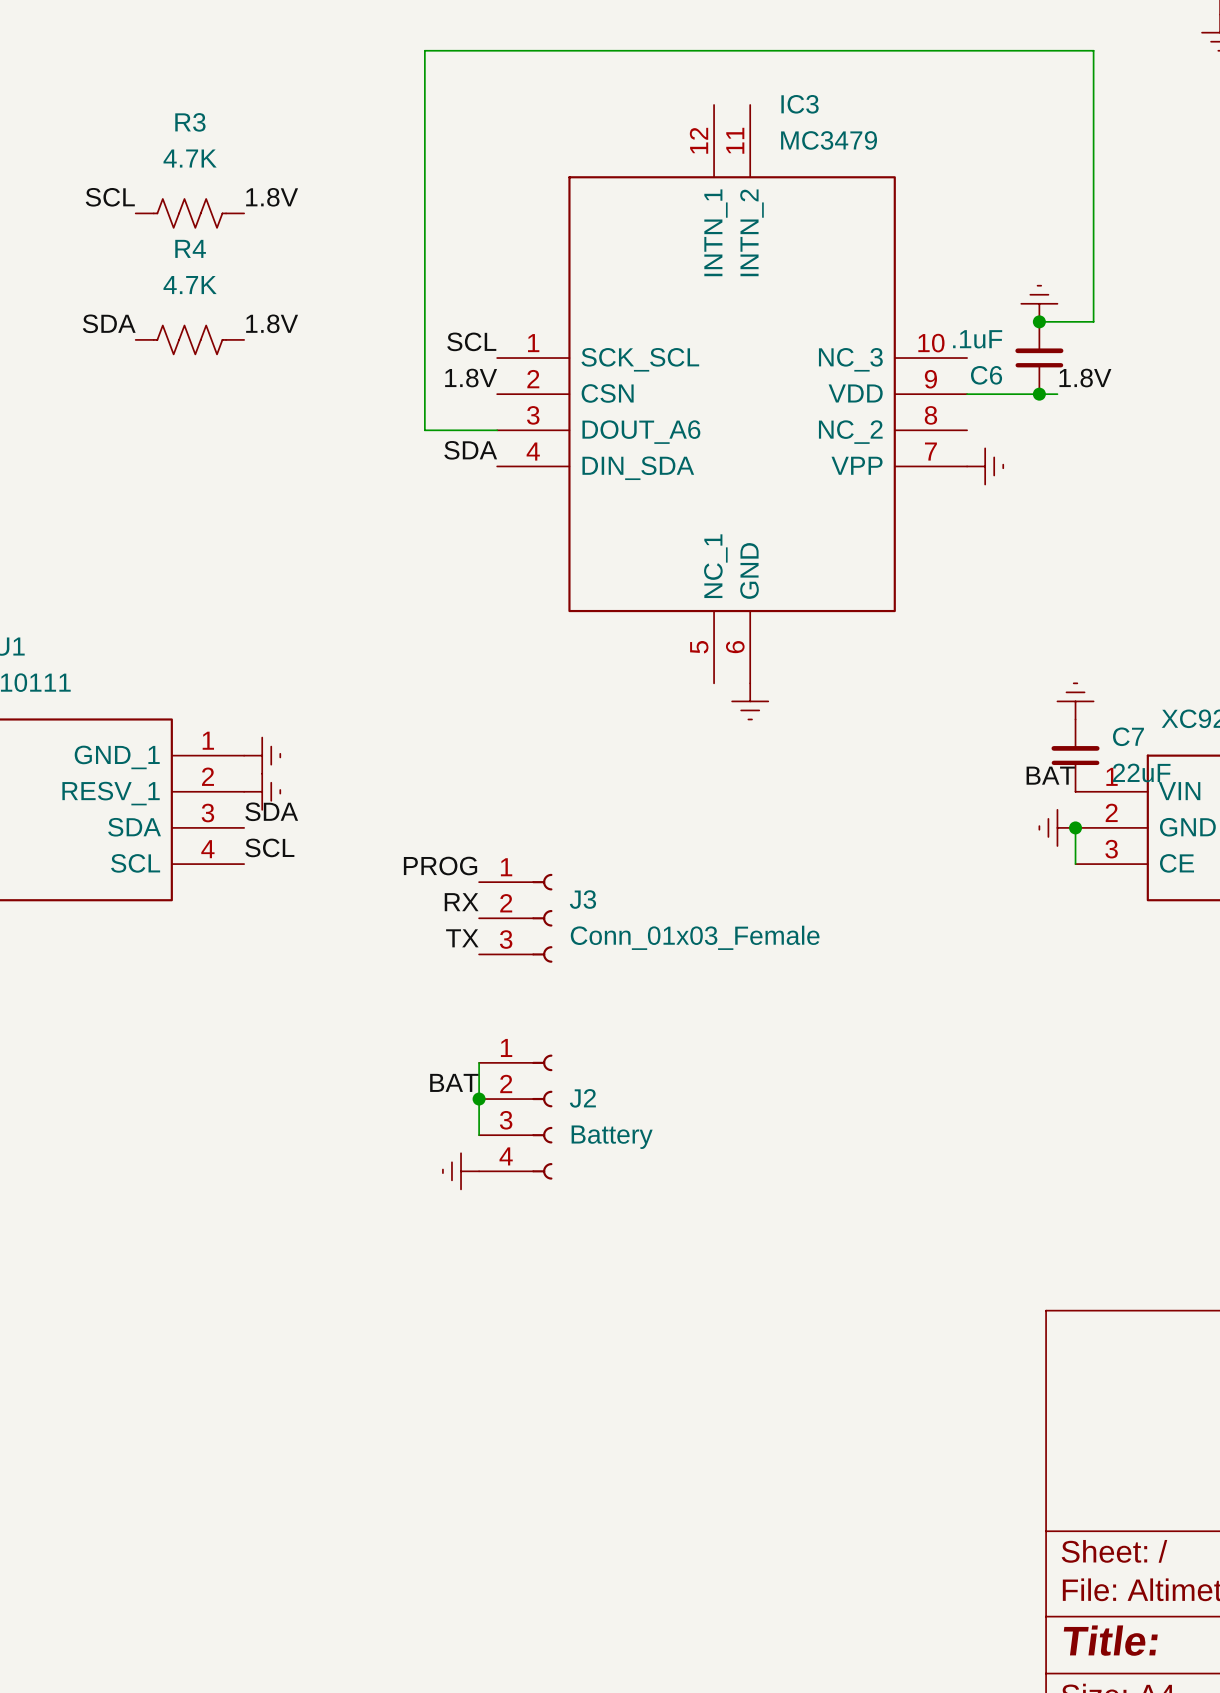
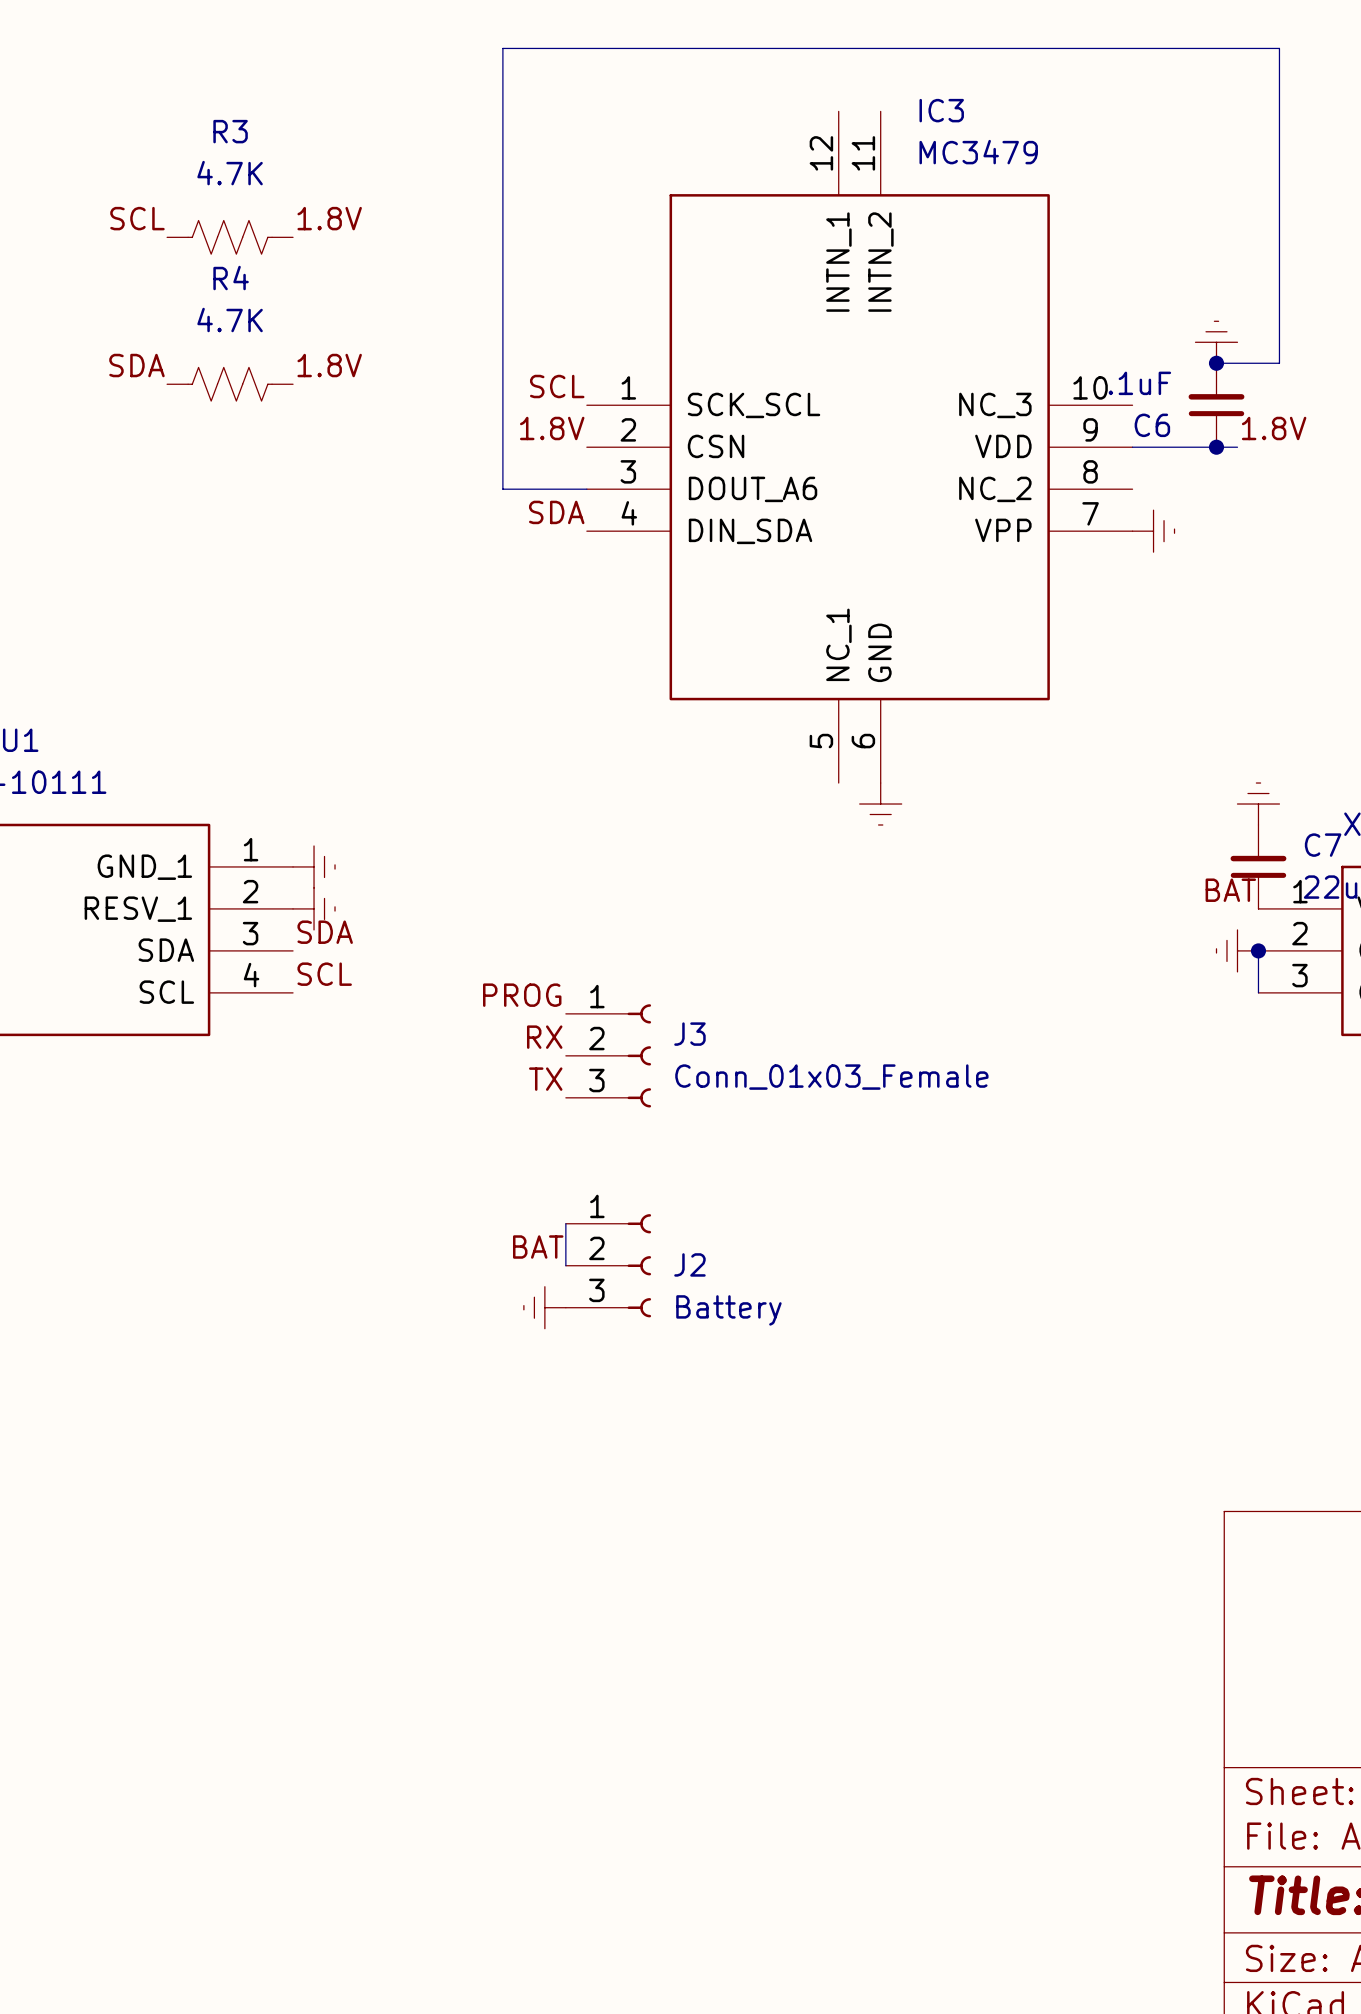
J2 symbol: [479, 1054, 553, 1180] -> [565, 1214, 652, 1318]
wire: (479, 1099) (479, 1135) -> none
junction: (479, 1099) -> none
power symbol position: (461, 1171) -> (544, 1307)

